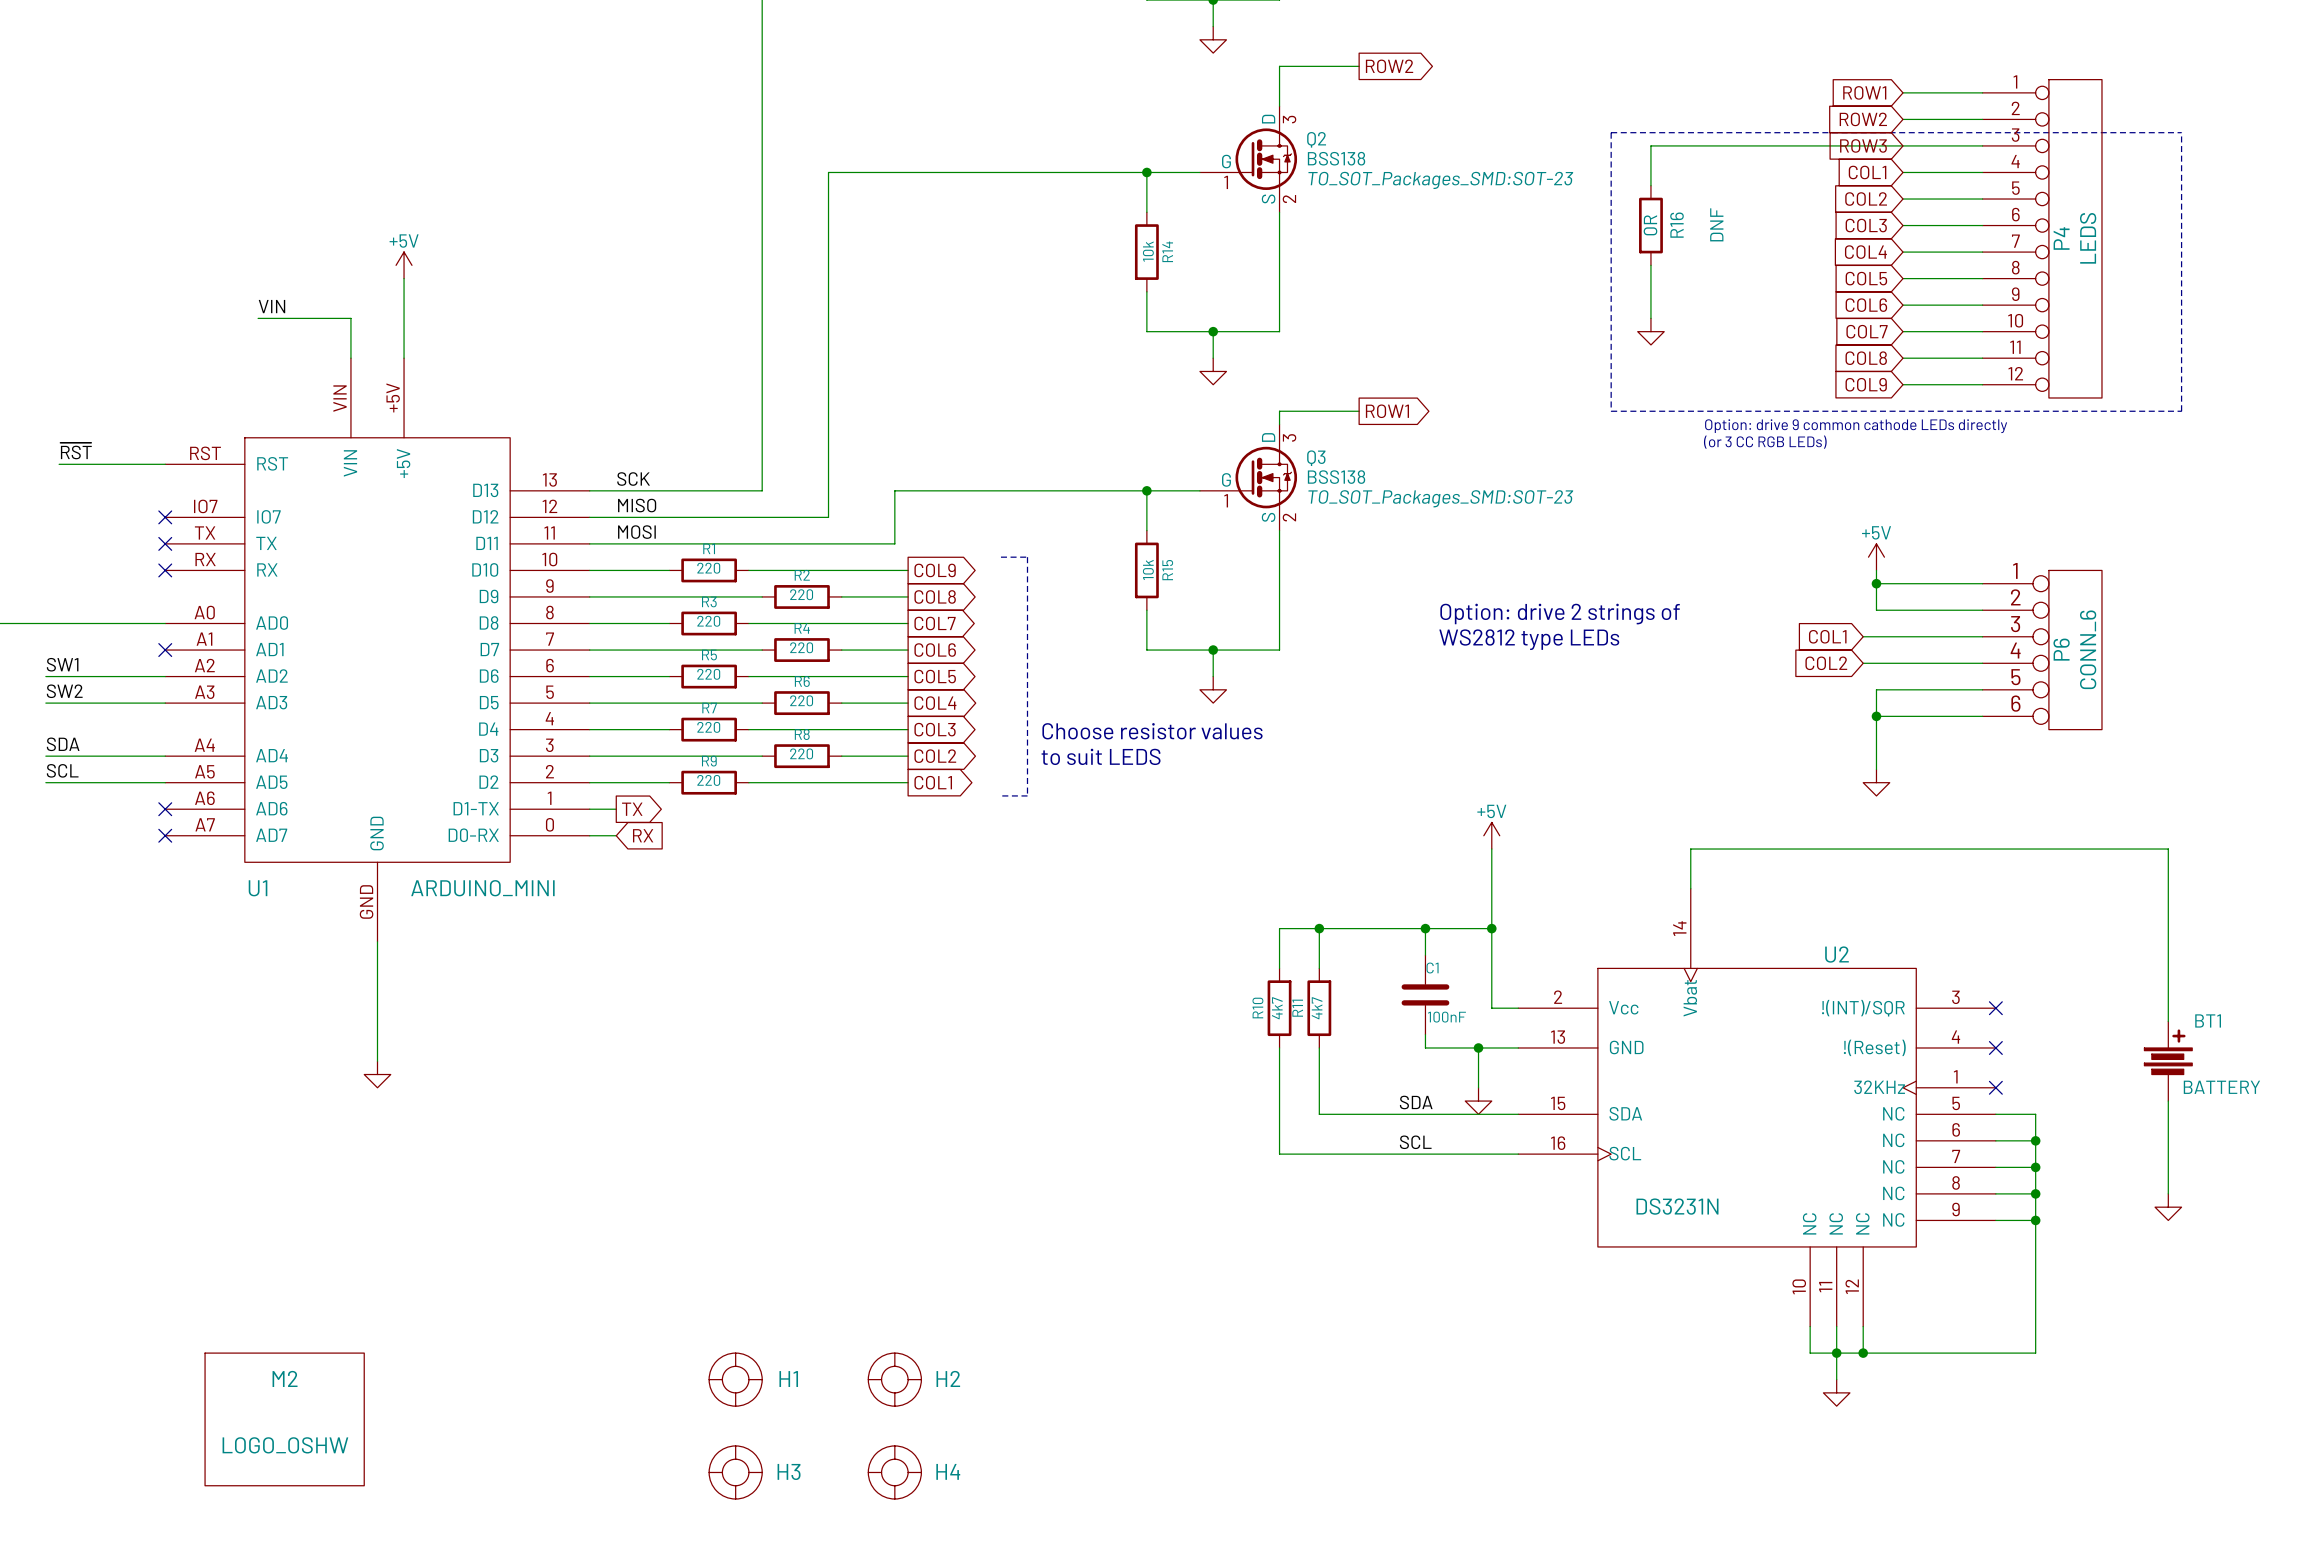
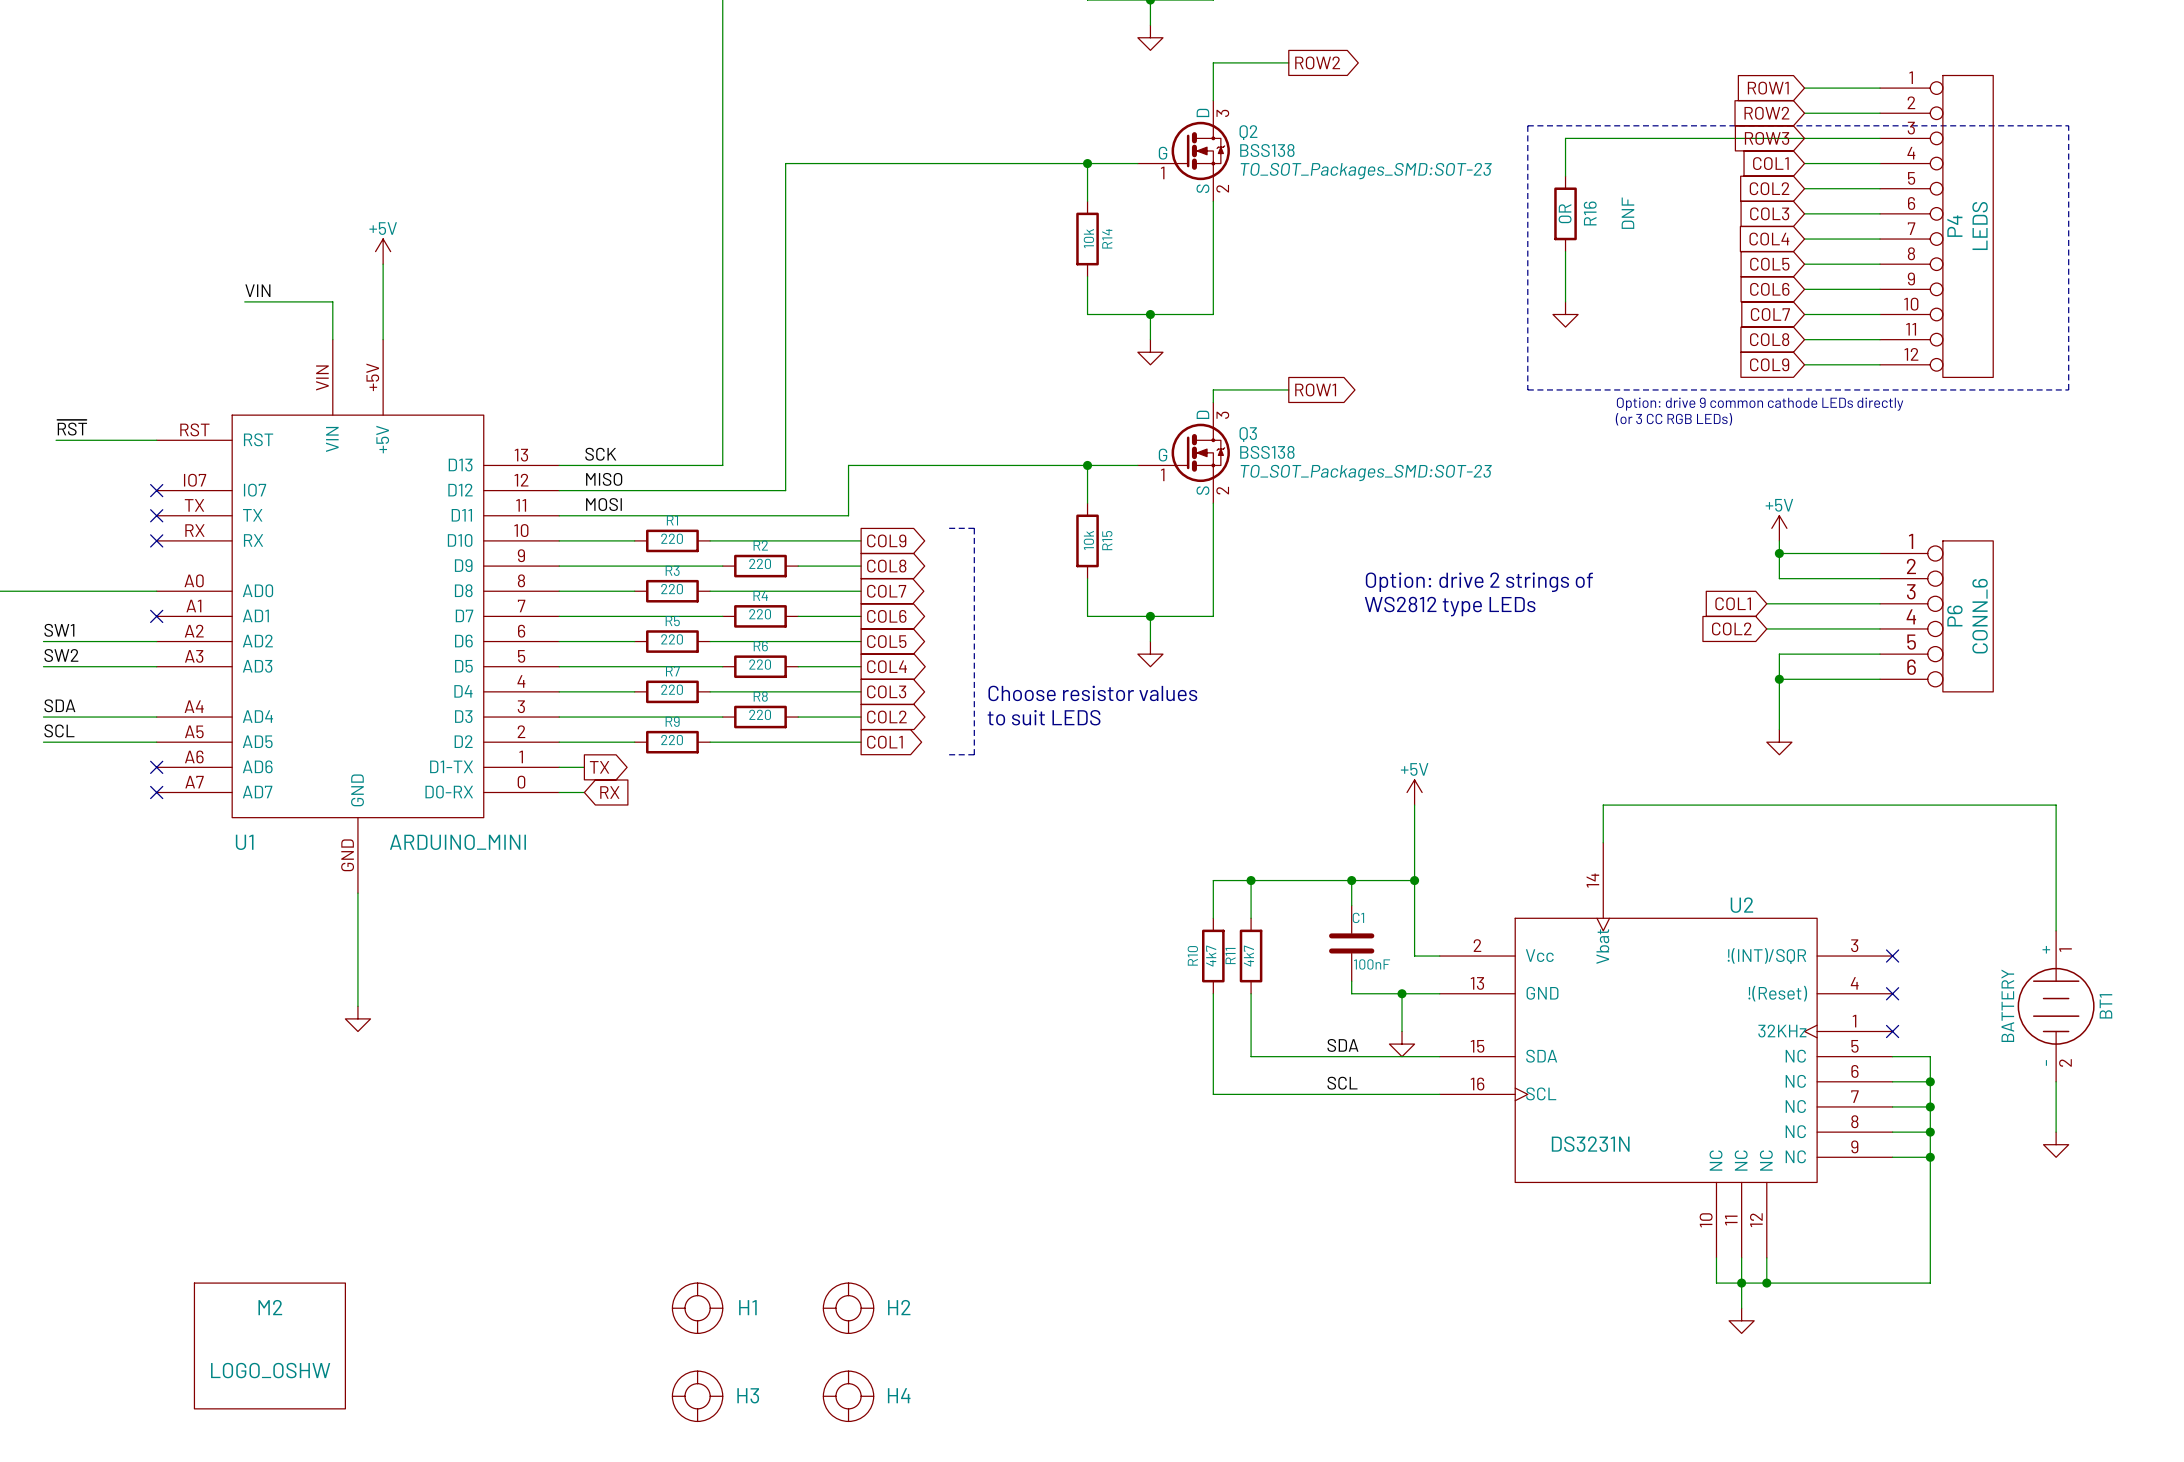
BT1 name position: BT1 (2208, 1020) -> BT1 (2105, 1006)
BT1 symbol: [2144, 1021, 2193, 1102] -> [2017, 930, 2095, 1082]
BT1 value position: BATTERY (2221, 1087) -> BATTERY (2007, 1005)

